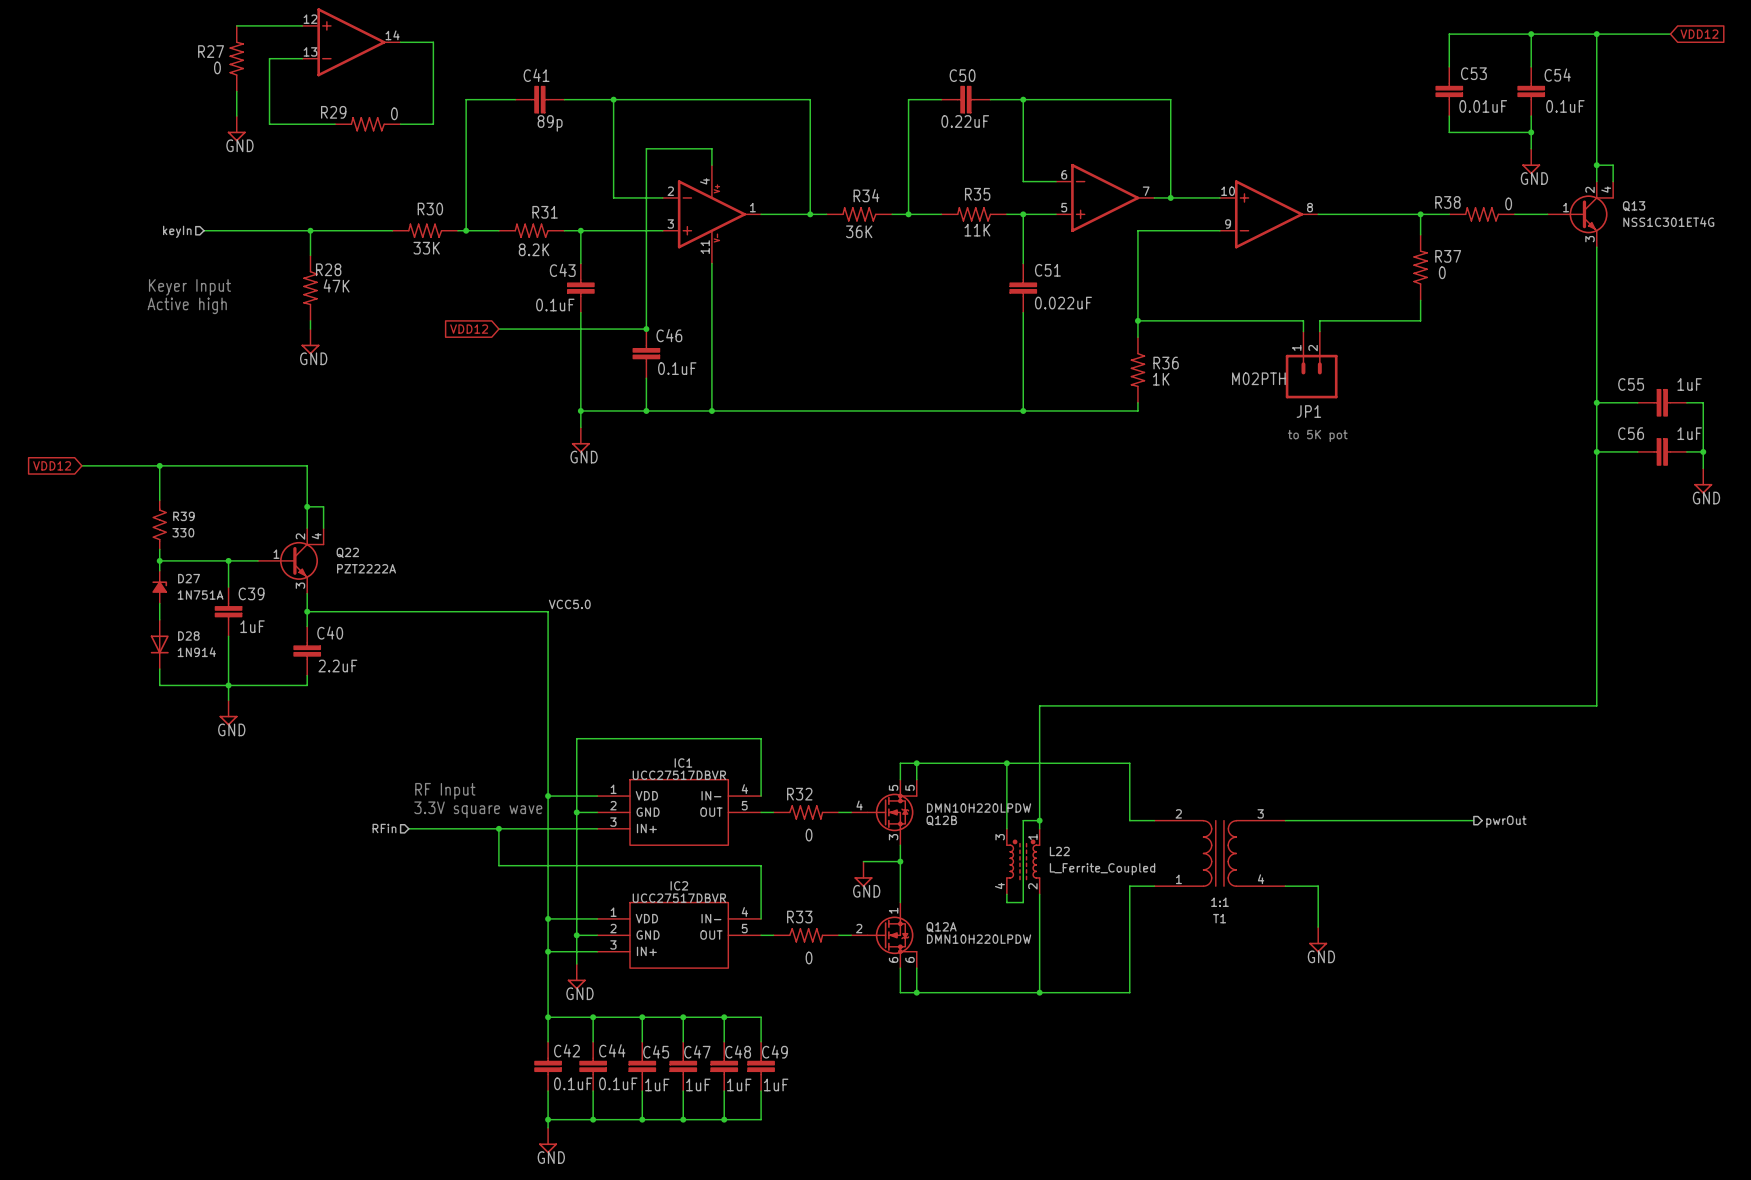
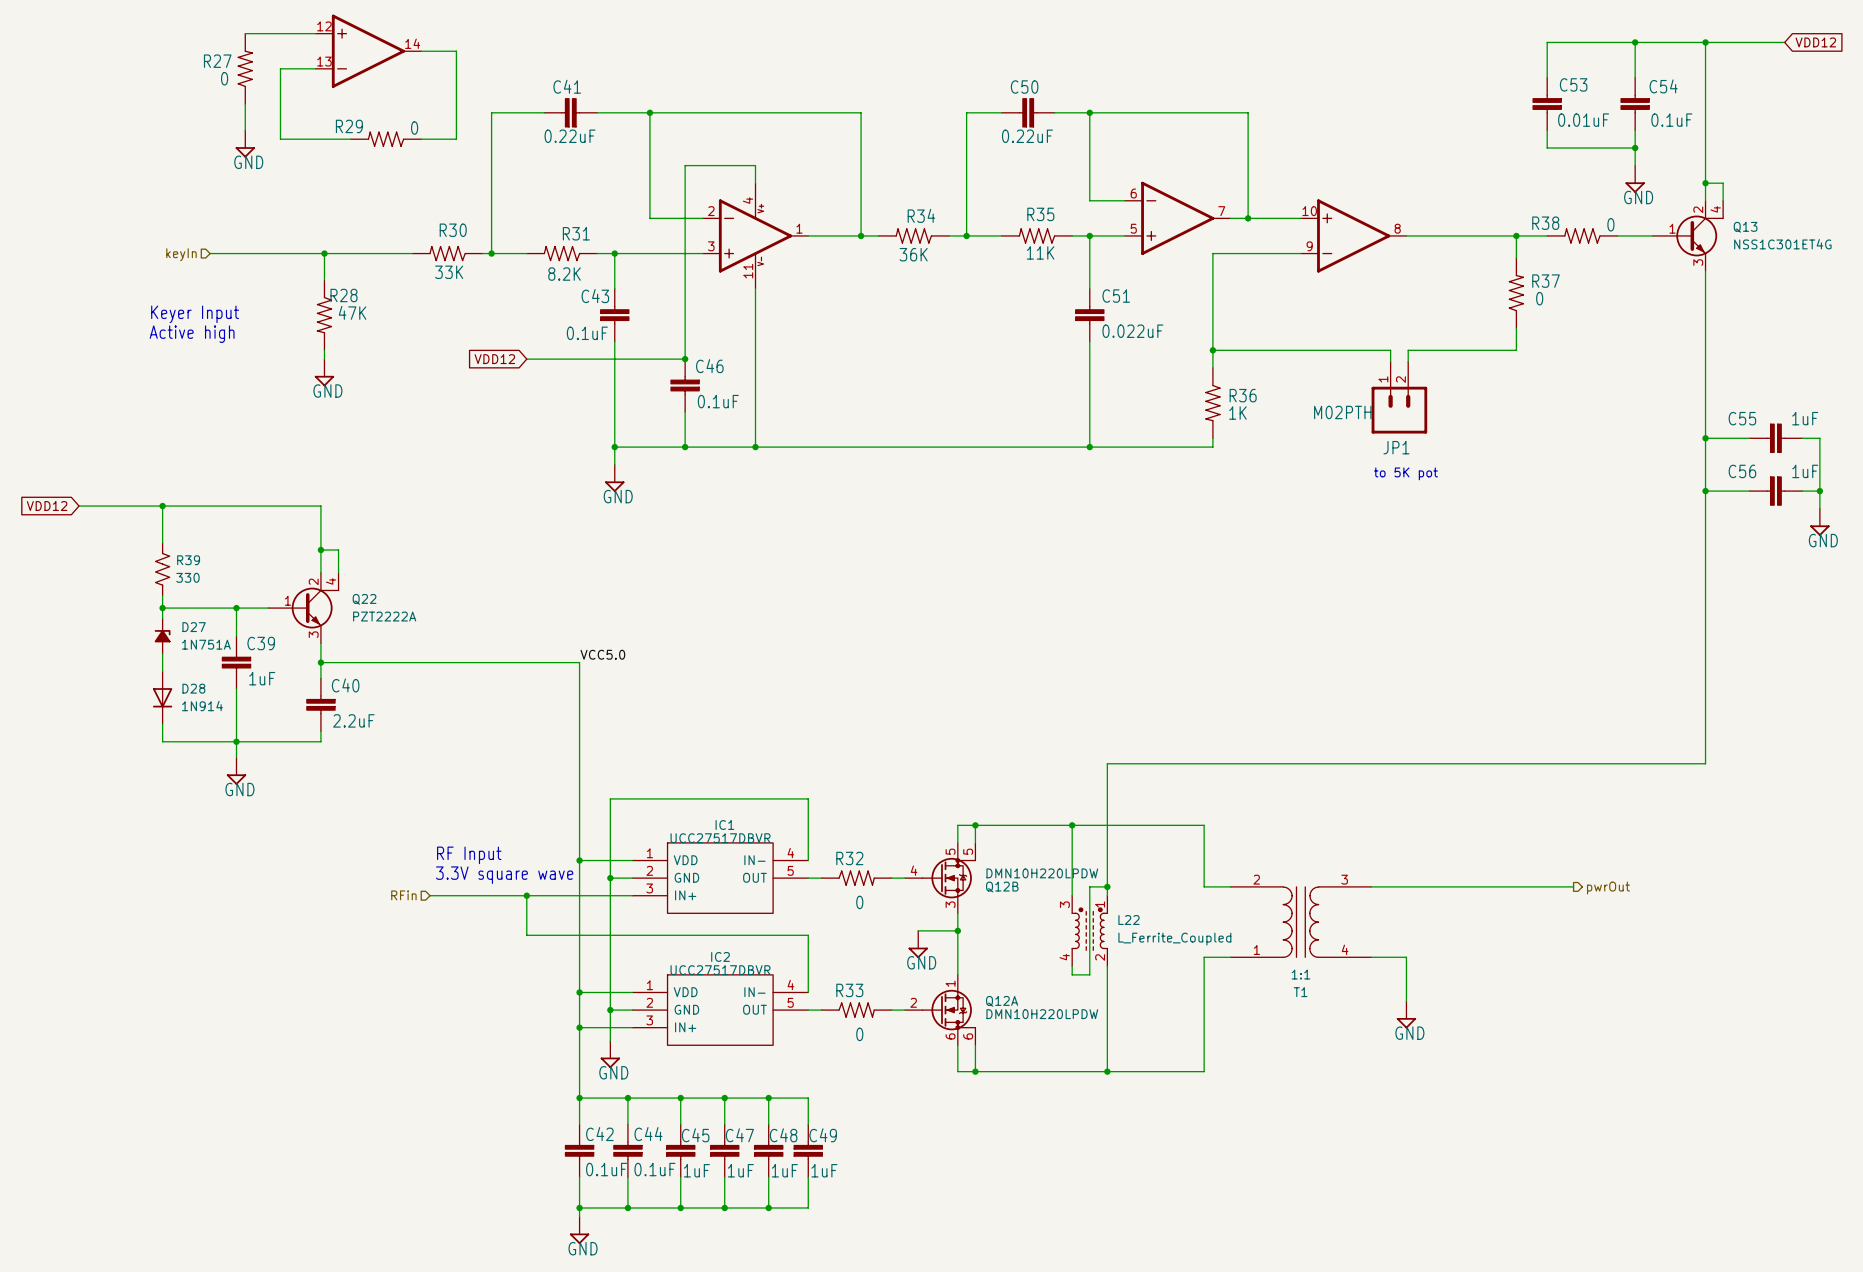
C41 value: 89p (550, 123) -> 0.22uF (570, 136)

